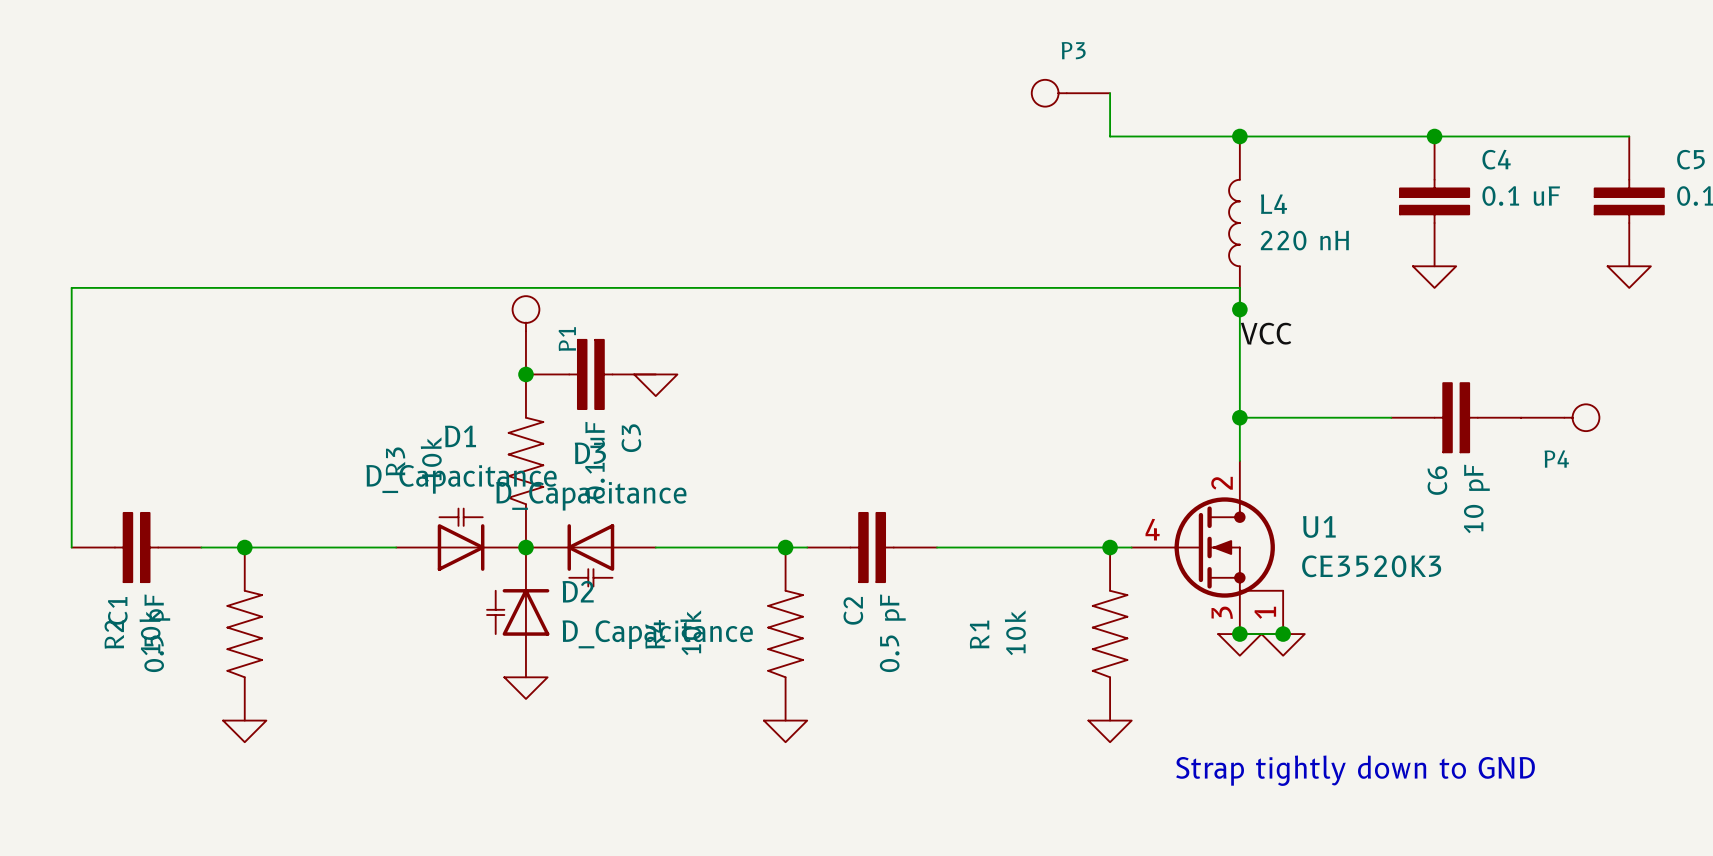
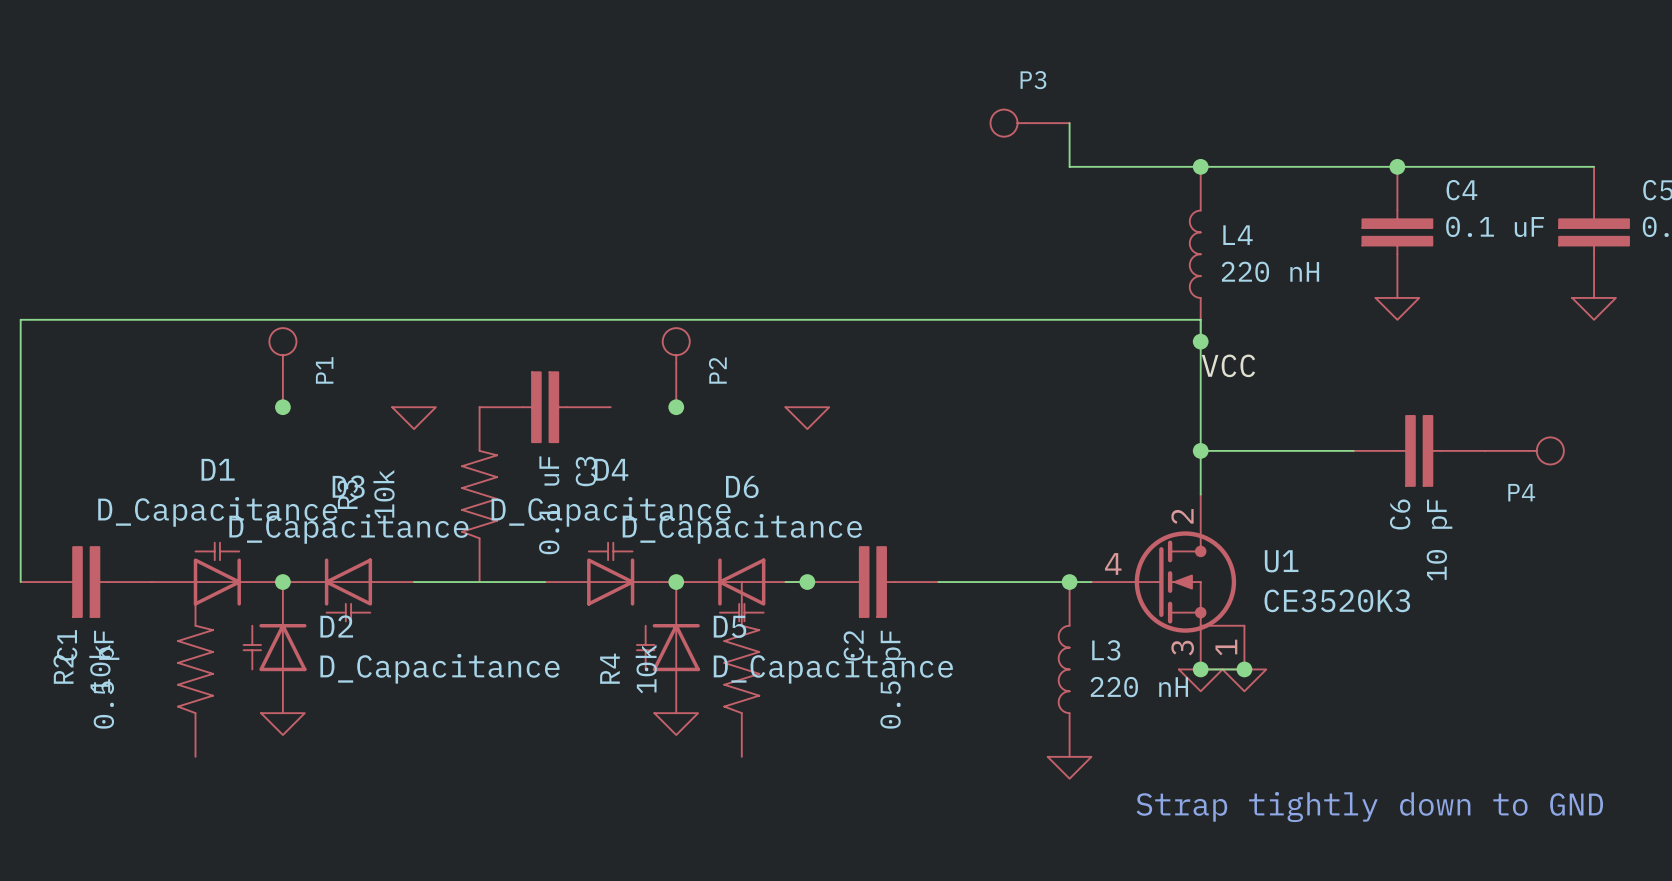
P1 position: (525, 335) -> (282, 367)
P2: none -> (676, 367)
junction: none -> (282, 407)
junction: (525, 374) -> none
junction: none -> (676, 407)
power symbol: none -> (414, 418)
power symbol: (655, 385) -> none
power symbol: none -> (807, 418)
D1 position: (461, 539) -> (217, 574)
D4: none -> D_Capacitance (610, 574)
junction position: (244, 547) -> (282, 582)
junction: (525, 547) -> none
junction: none -> (676, 582)
junction: (785, 547) -> none
junction: none -> (807, 582)
C2 position: (872, 547) -> (872, 582)
D3 position: (590, 555) -> (348, 589)
D6: none -> D_Capacitance (741, 589)
D2 position: (518, 612) -> (275, 647)
D5: none -> D_Capacitance (668, 647)
L3: none -> 220 nH (1064, 669)
R1: 10k (1110, 634) -> none
power symbol: (525, 688) -> none
power symbol position: (244, 731) -> (282, 724)
power symbol position: (785, 731) -> (676, 724)

